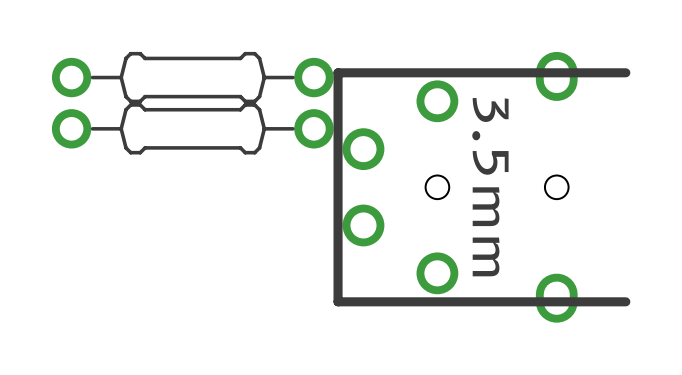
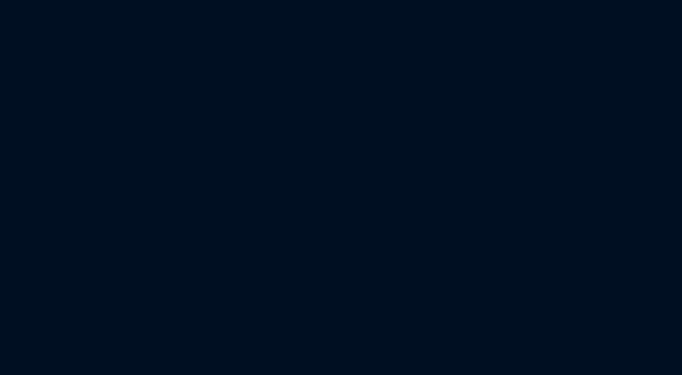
part: (192, 77) -> none
part: (192, 128) -> none
part: (481, 187) -> none

